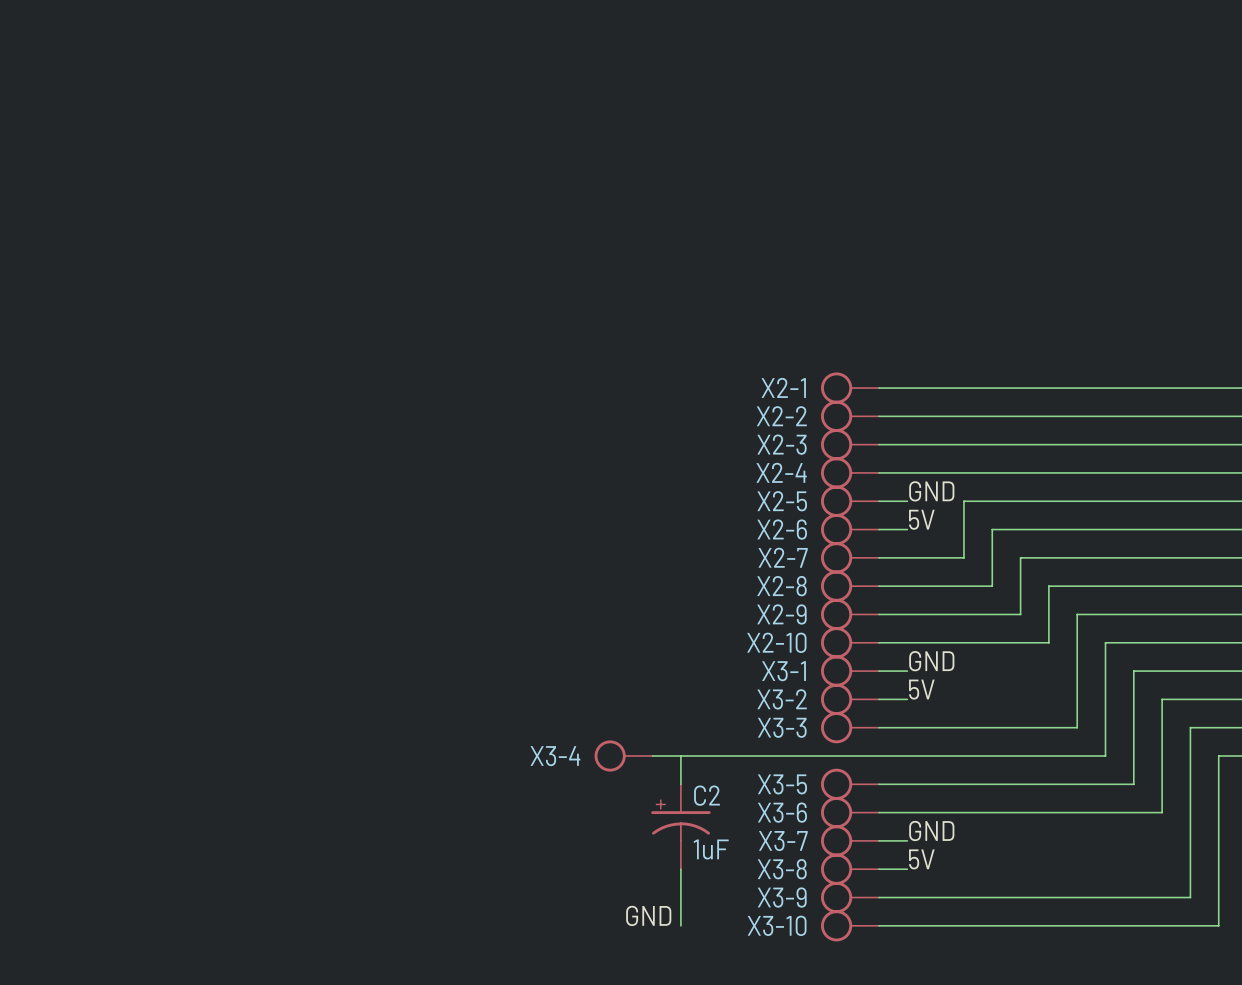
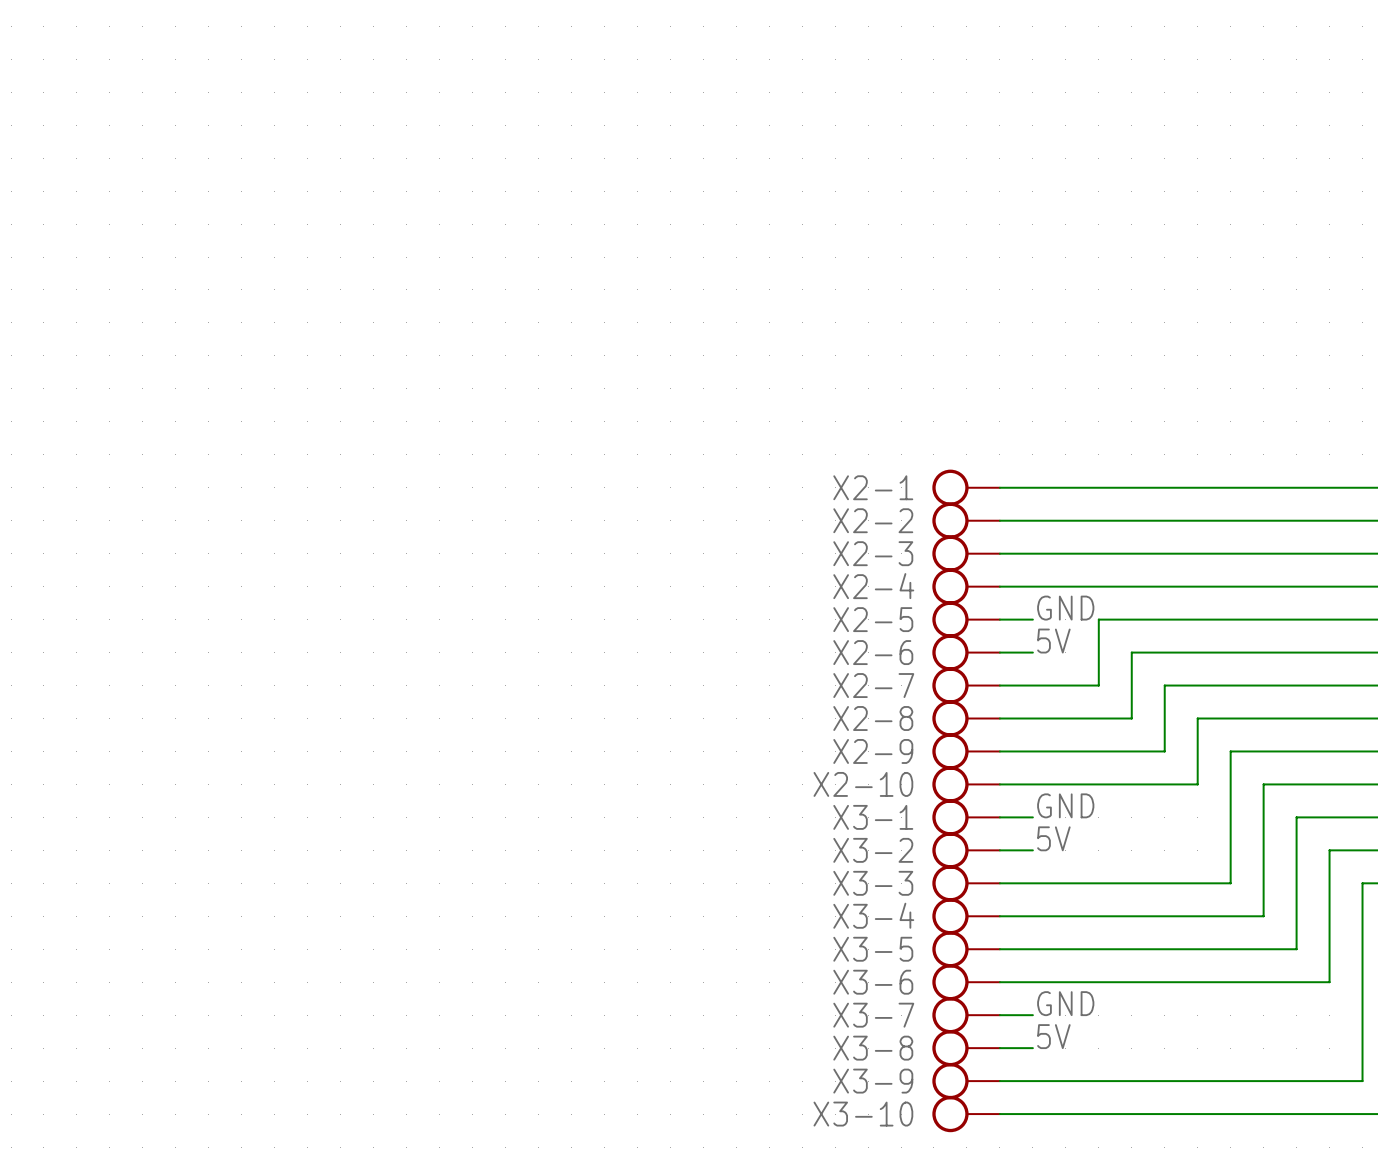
X3-4 position: (623, 756) -> (966, 916)
wire: (652, 756) (879, 756) -> none
wire: (680, 756) (680, 784) -> none
C2: 1uF (680, 826) -> none
wire: (680, 869) (680, 925) -> none
label: GND (648, 915) -> none

